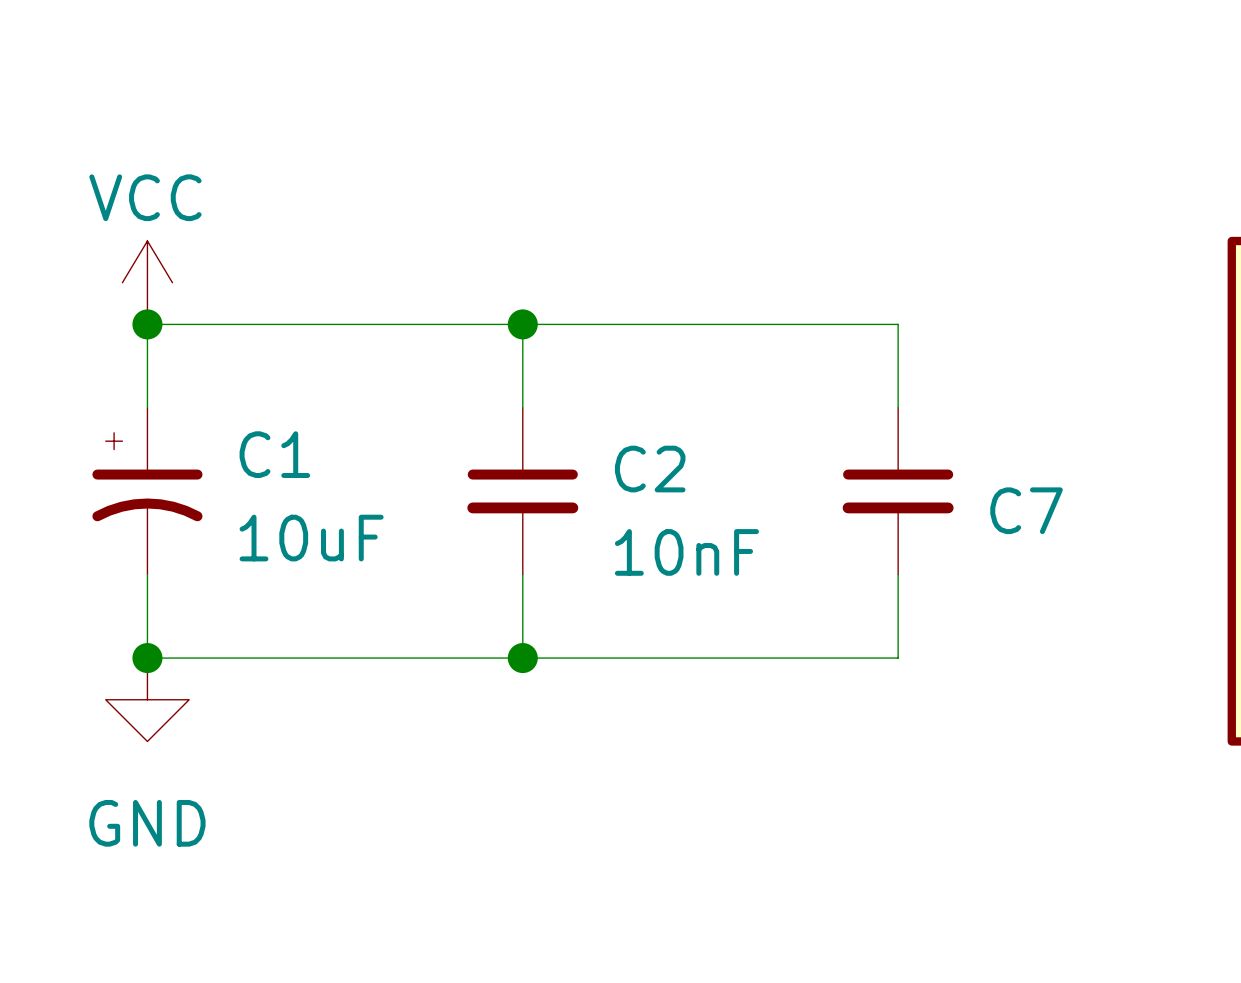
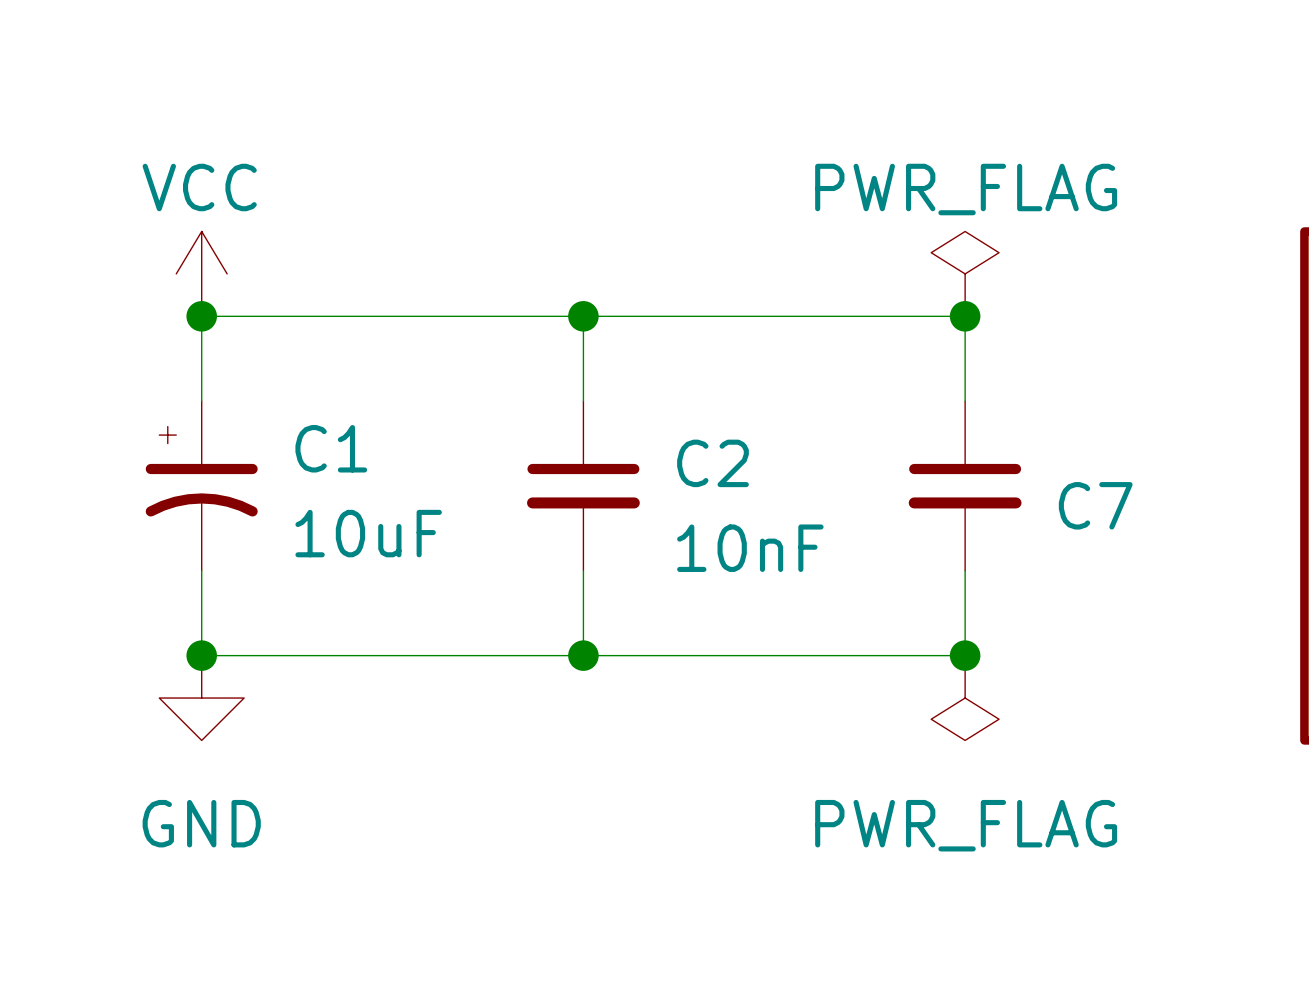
power symbol: none -> PWR_FLAG (965, 273)
junction: none -> (965, 316)
junction: none -> (965, 655)
power symbol: none -> PWR_FLAG (965, 698)

